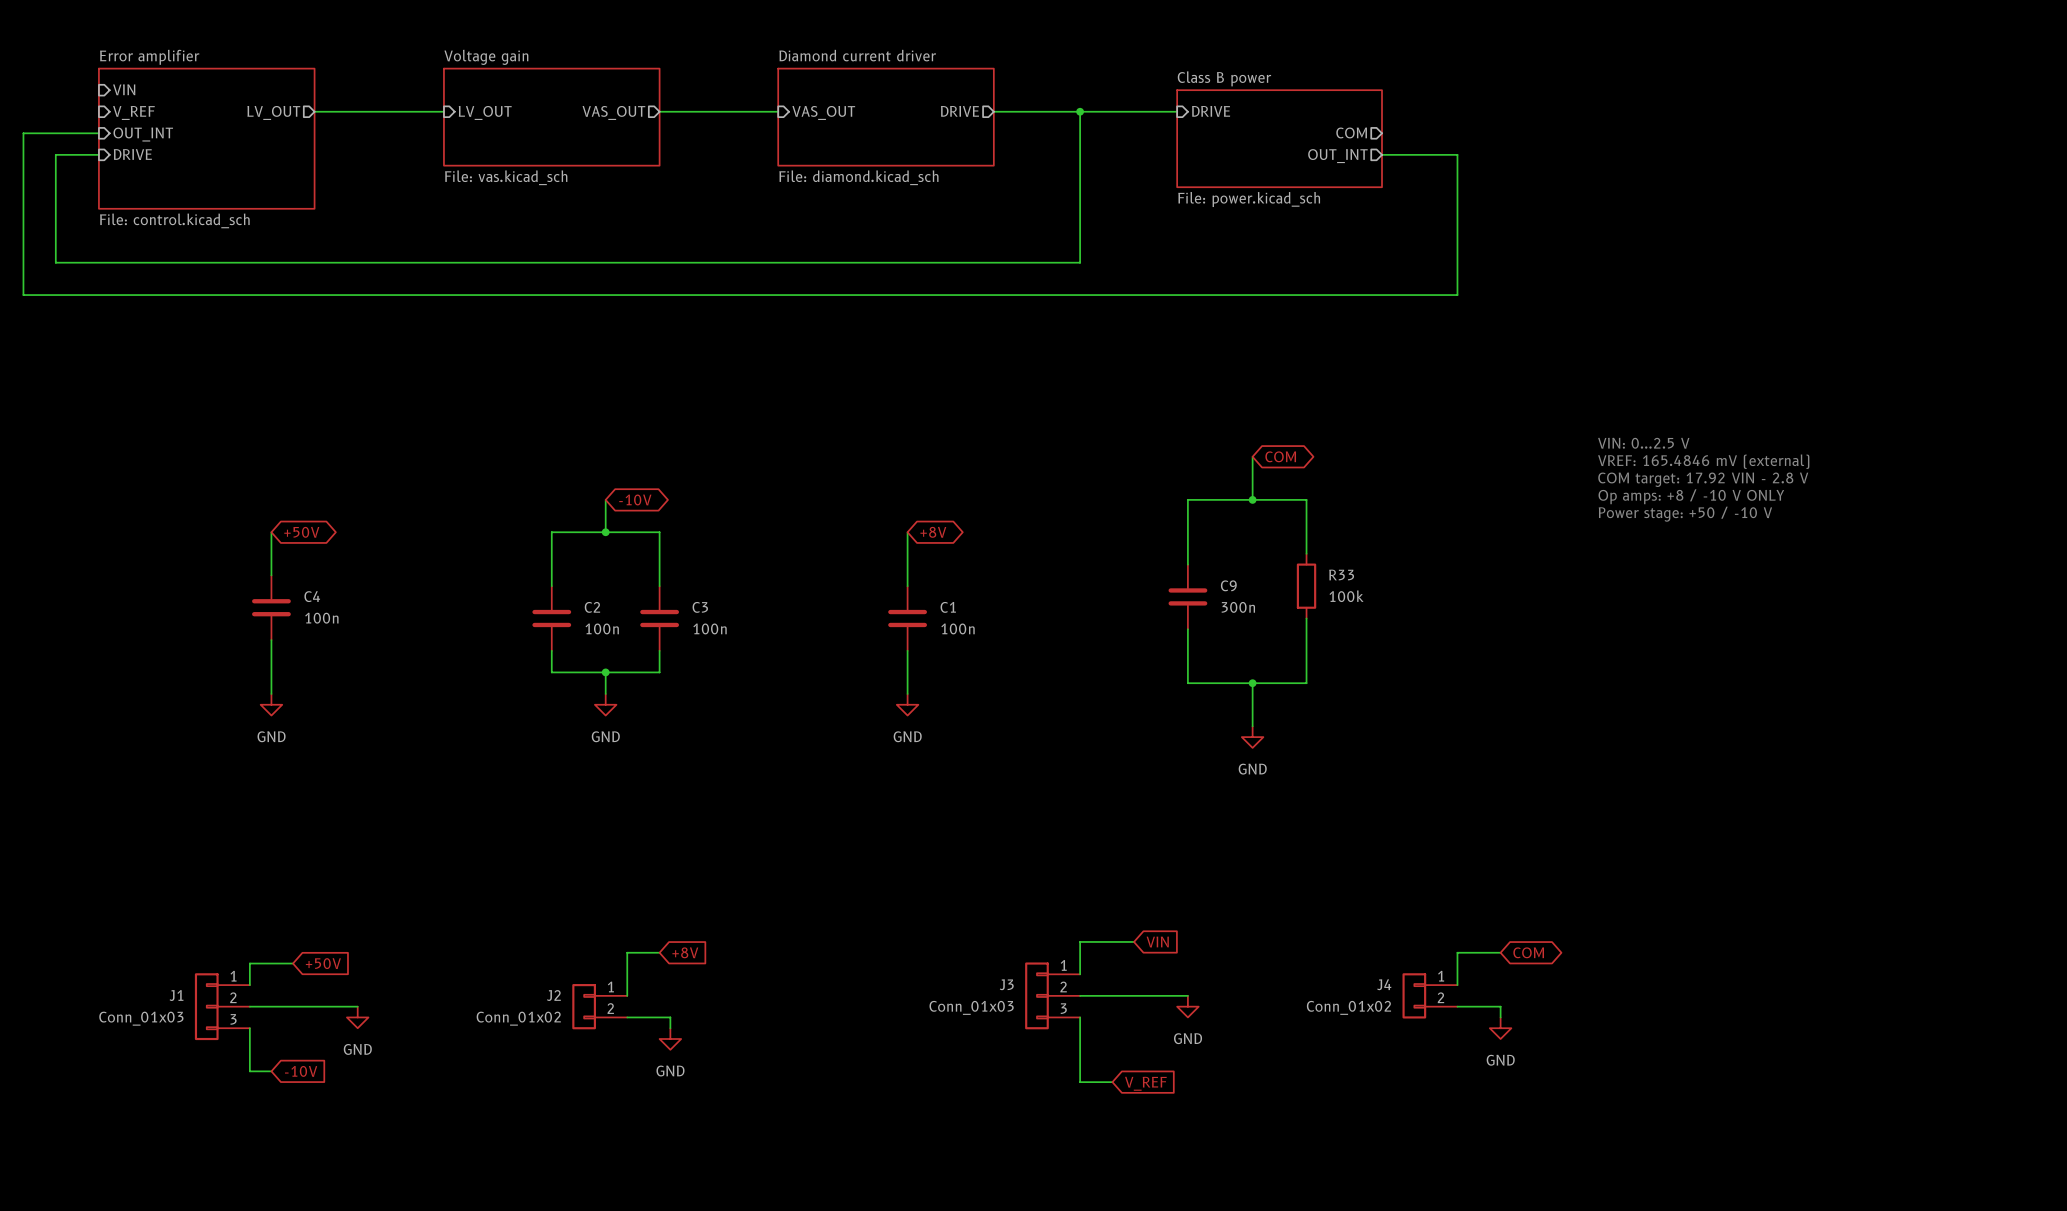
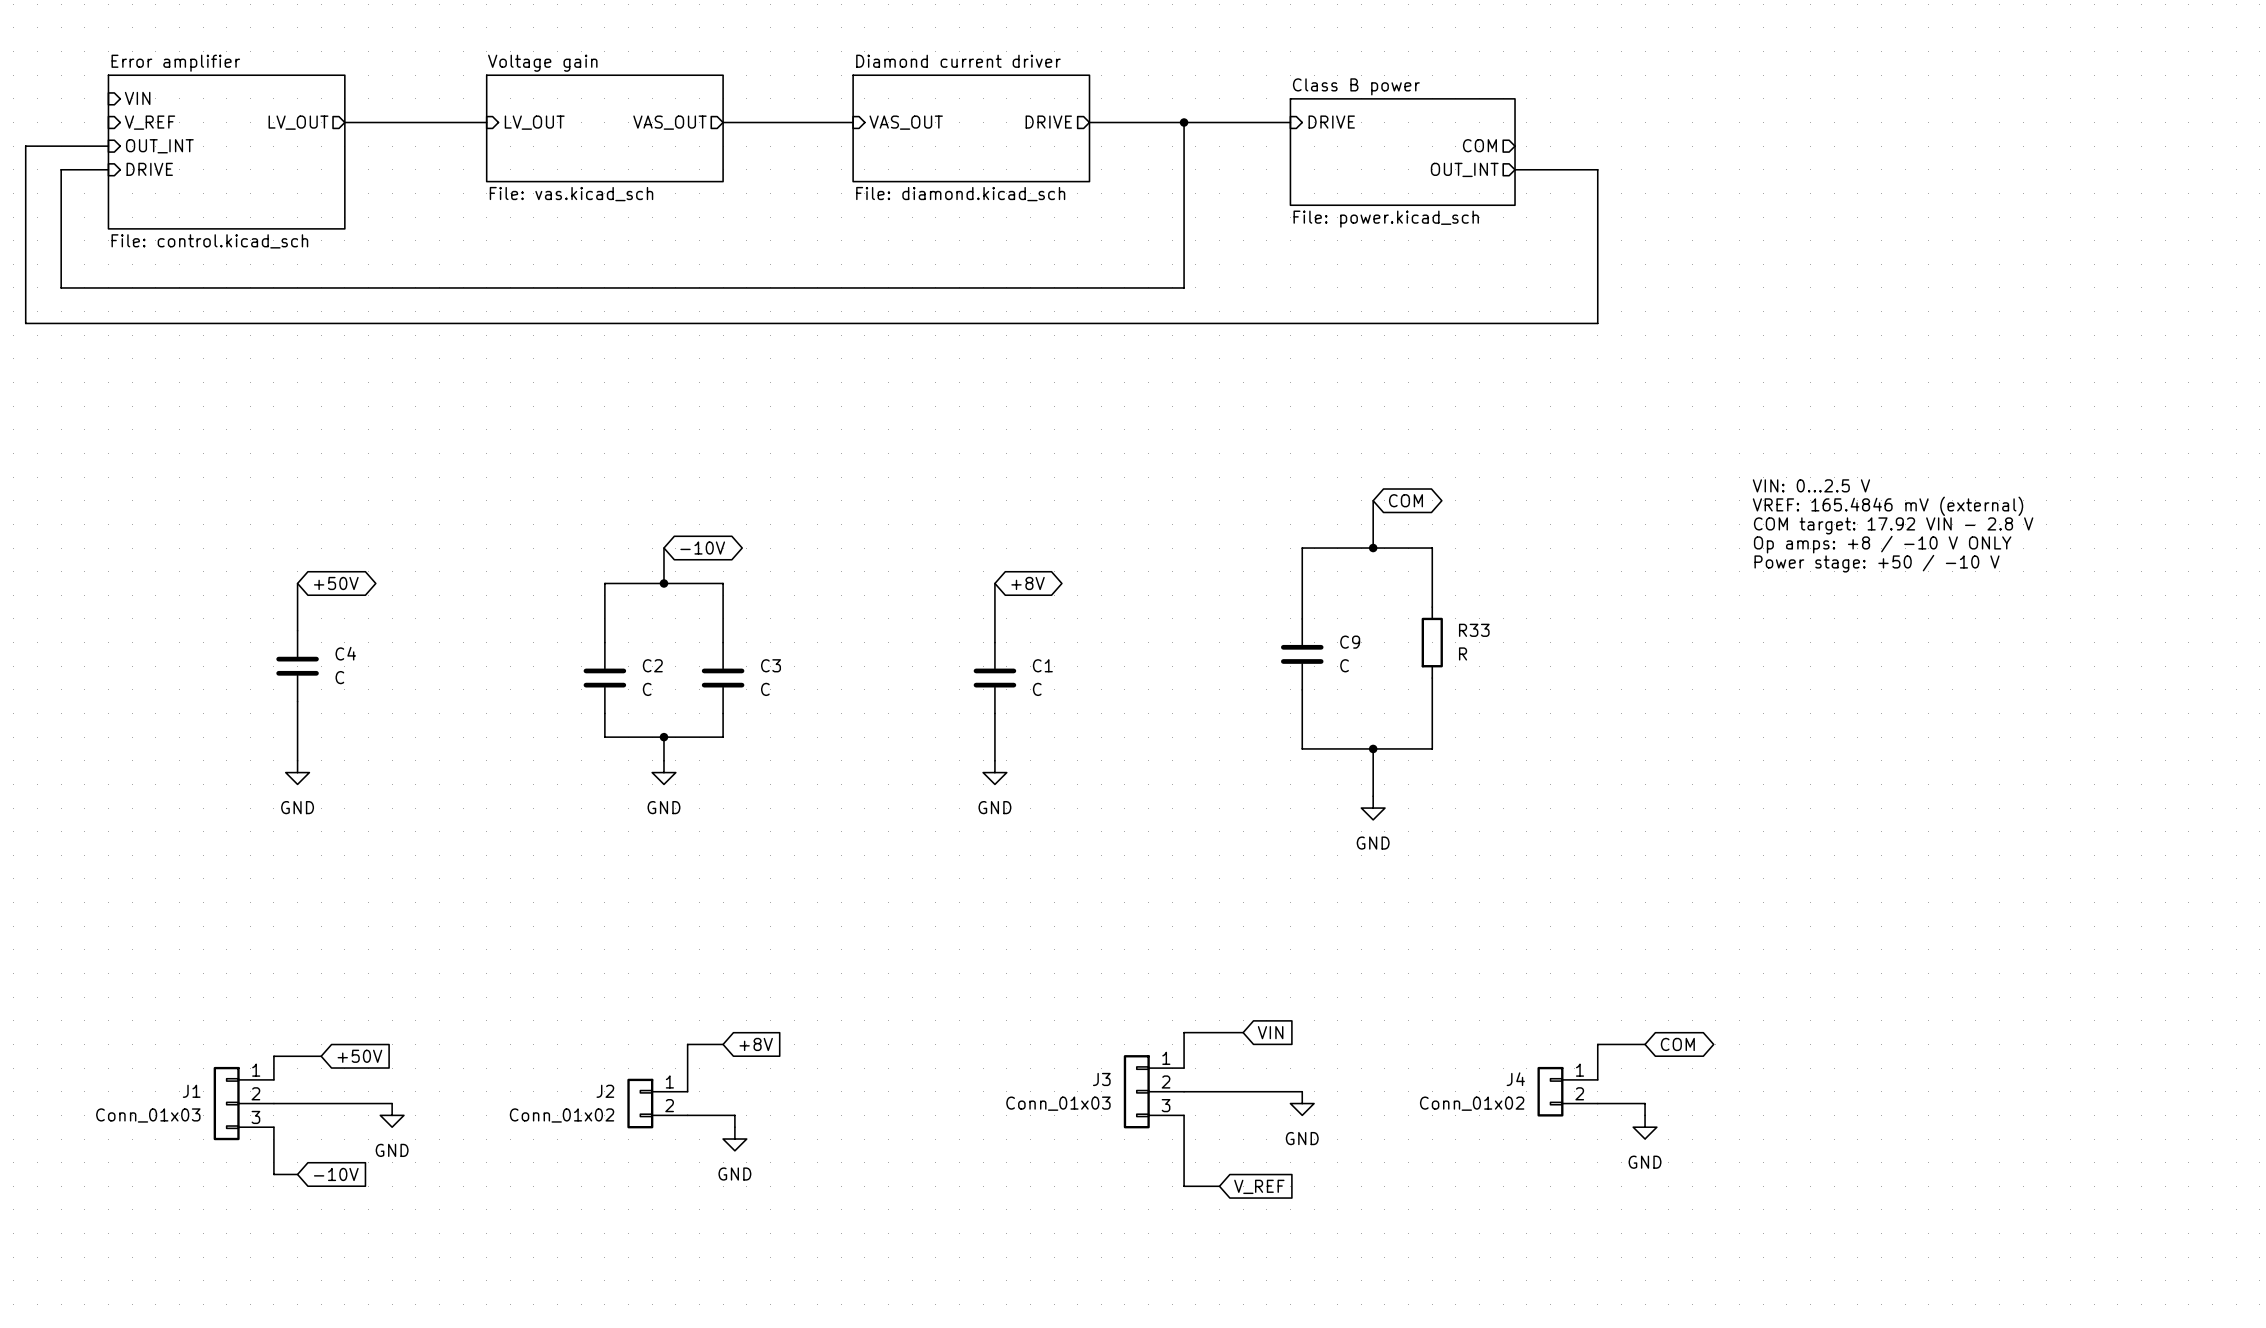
R33 value: 100k (1346, 596) -> R (1463, 653)
C9 value: 300n (1238, 607) -> C (1344, 665)
C4 value: 100n (321, 618) -> C (339, 677)
C2 value: 100n (602, 628) -> C (647, 689)
C3 value: 100n (710, 628) -> C (765, 689)
C1 value: 100n (958, 628) -> C (1037, 689)

